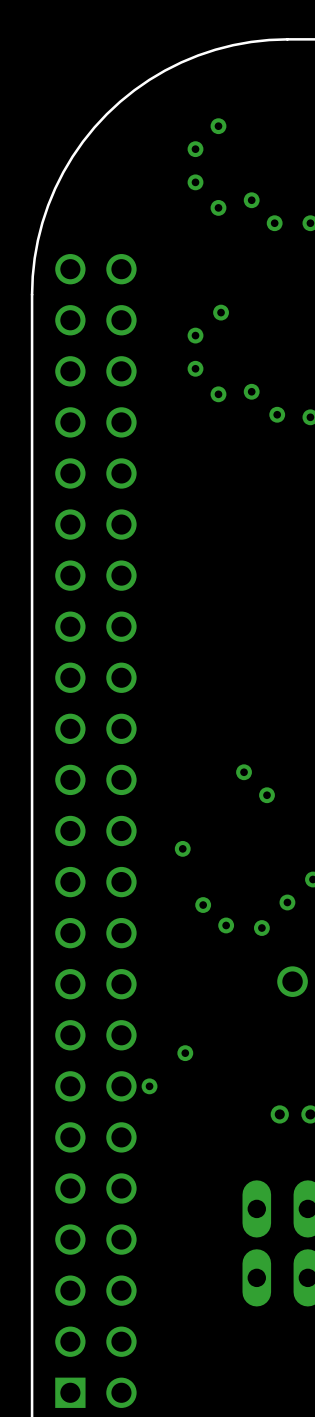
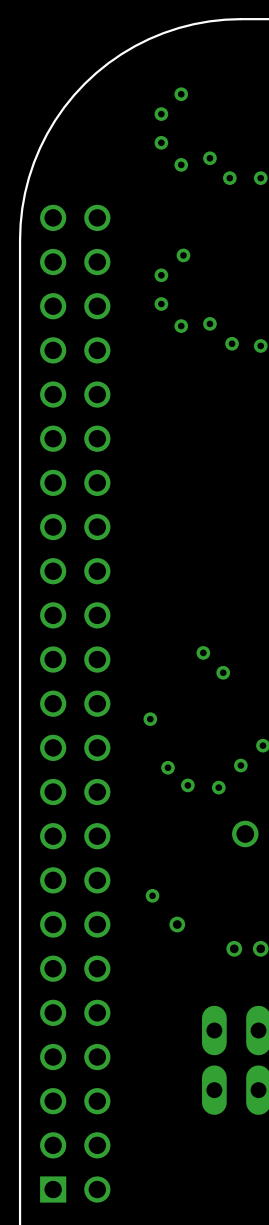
via: (149, 1086) -> none
via: none -> (177, 924)

